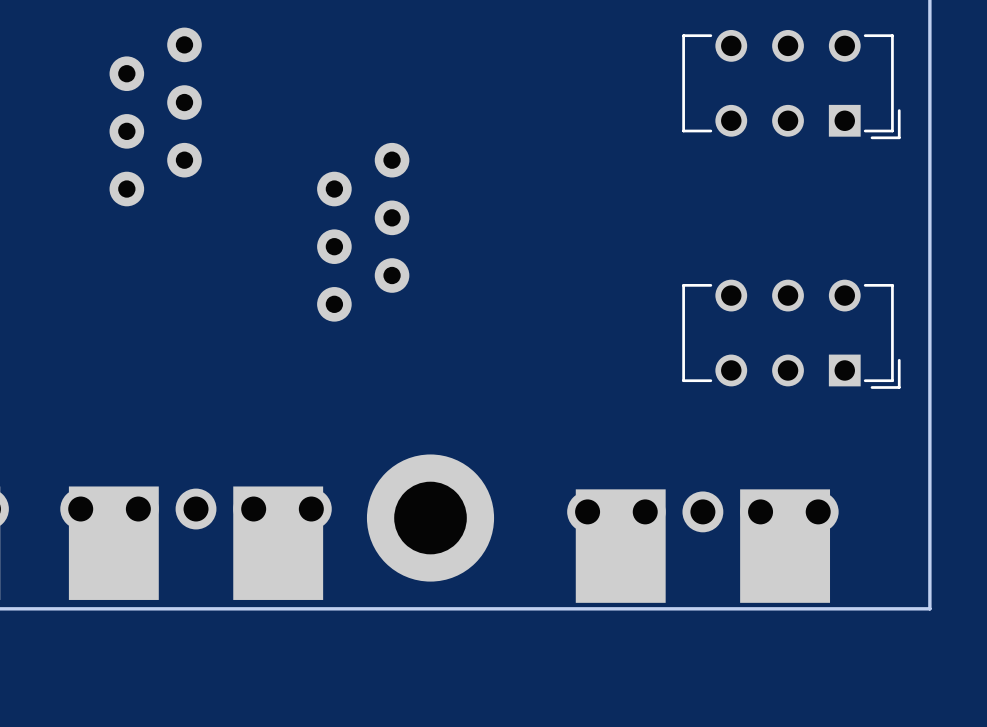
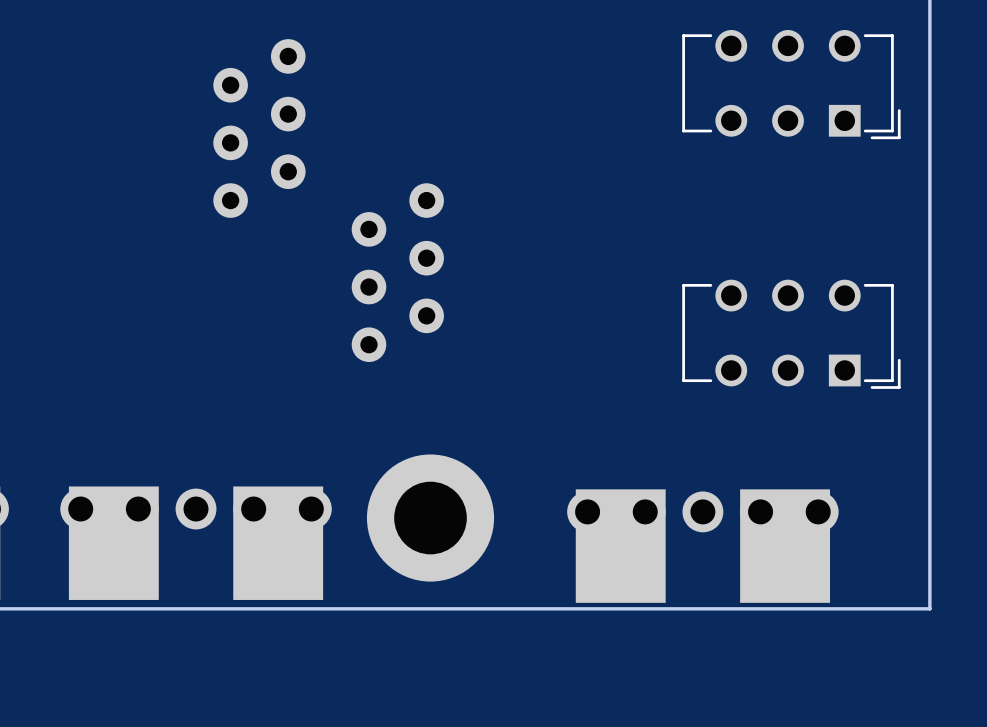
part: (155, 116) -> none
part: none -> (259, 128)
part position: (363, 232) -> (397, 272)

